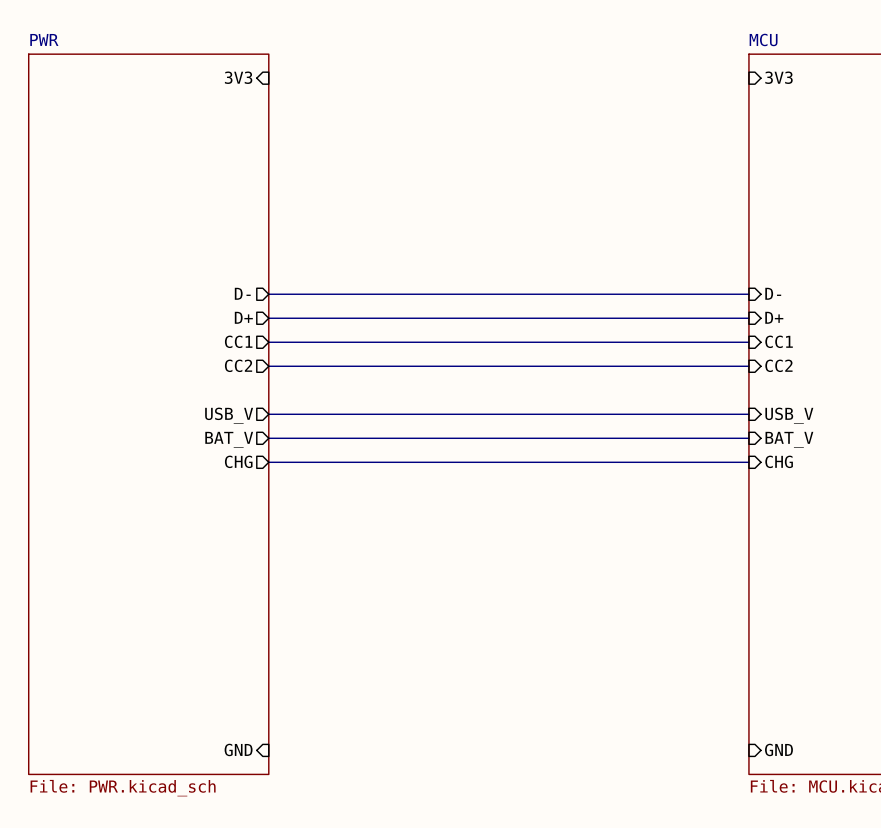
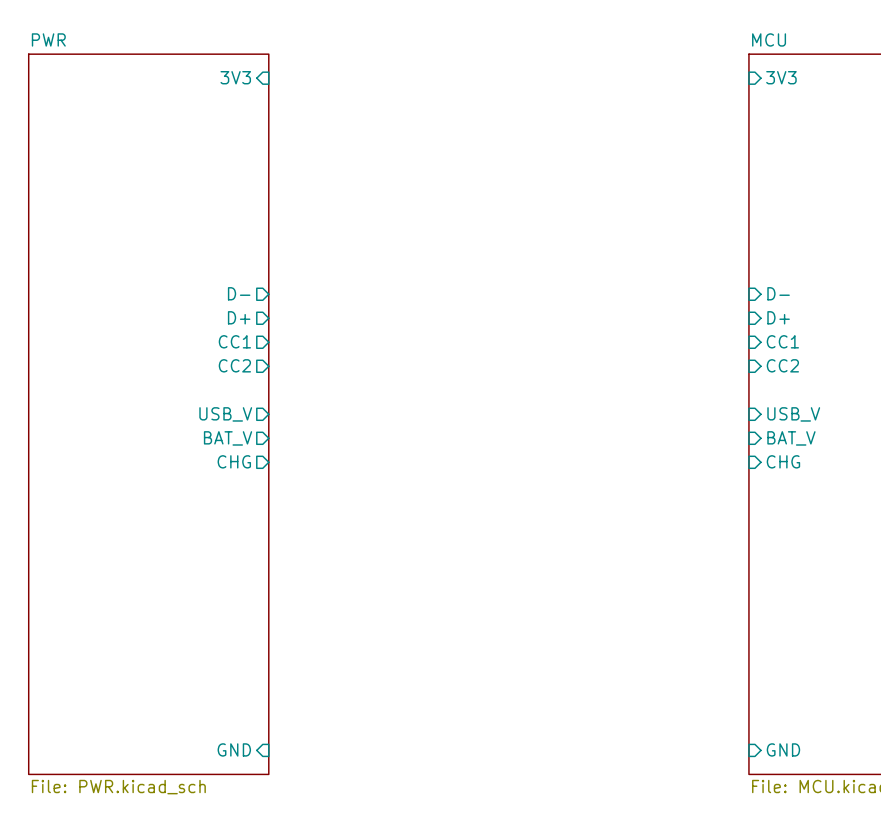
wire: (268, 294) (748, 294) -> none
wire: (268, 318) (748, 318) -> none
wire: (268, 342) (748, 342) -> none
wire: (268, 366) (748, 366) -> none
wire: (268, 414) (748, 414) -> none
wire: (268, 438) (748, 438) -> none
wire: (268, 462) (748, 462) -> none

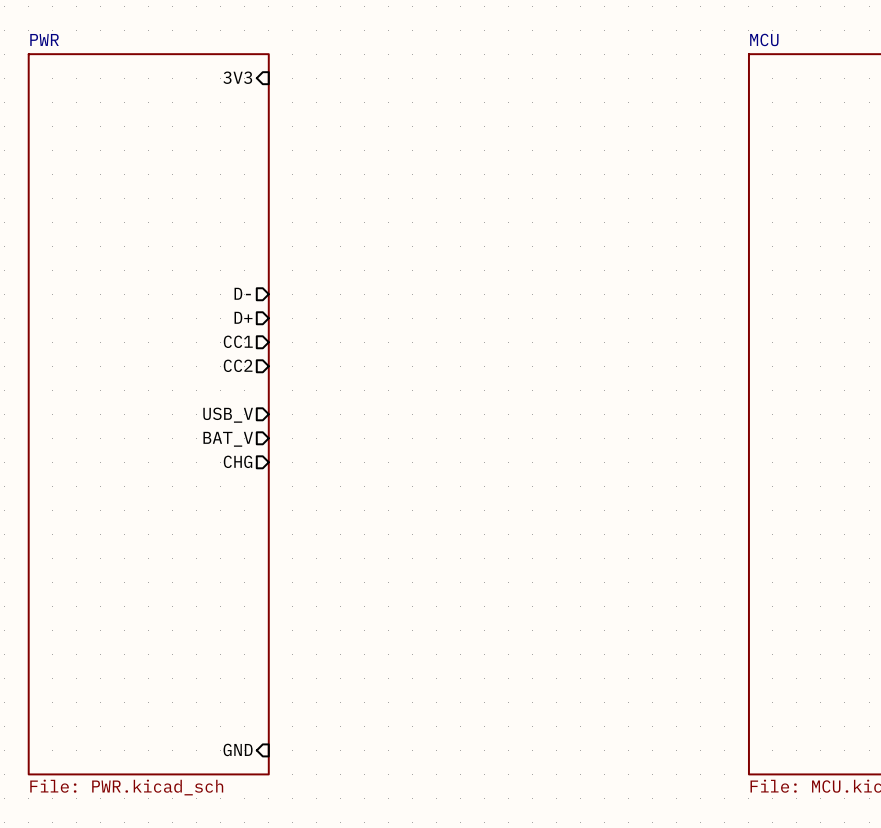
sheet pin: 3V3 (781, 77) -> none
sheet pin: D- (778, 293) -> none
sheet pin: D+ (778, 317) -> none
sheet pin: CC1 (782, 341) -> none
sheet pin: CC2 (782, 365) -> none
sheet pin: USB_V (793, 414) -> none
sheet pin: BAT_V (791, 438) -> none
sheet pin: CHG (783, 461) -> none
sheet pin: GND (783, 749) -> none

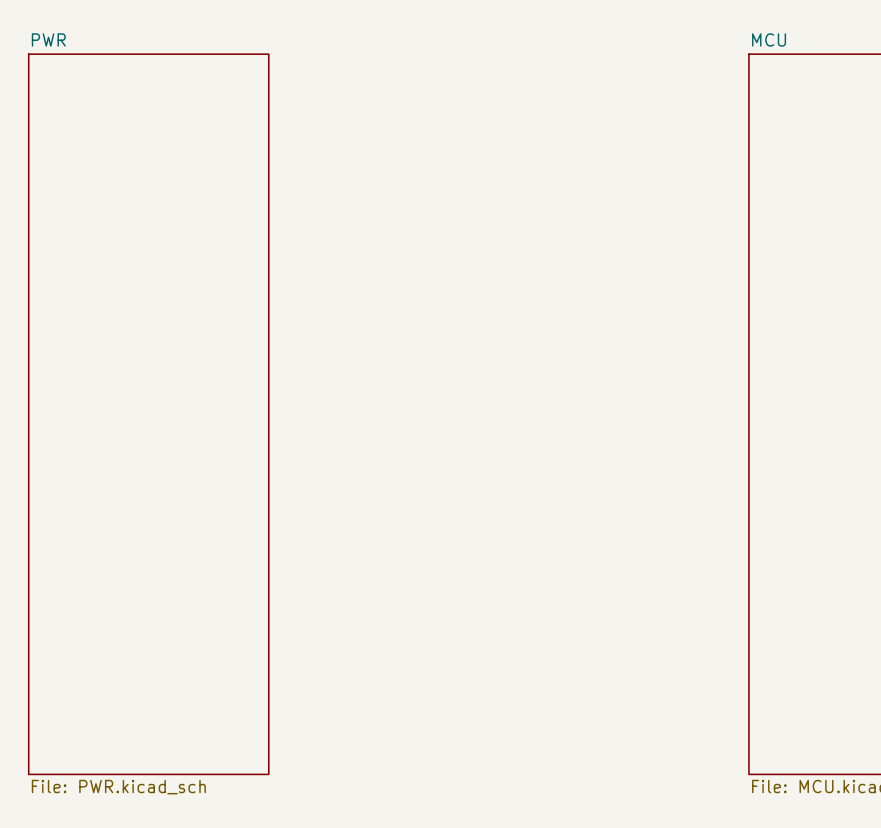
sheet pin: 3V3 (237, 77) -> none
sheet pin: D- (242, 293) -> none
sheet pin: D+ (243, 317) -> none
sheet pin: CC1 (238, 341) -> none
sheet pin: CC2 (238, 365) -> none
sheet pin: USB_V (228, 415) -> none
sheet pin: BAT_V (228, 439) -> none
sheet pin: CHG (238, 461) -> none
sheet pin: GND (238, 749) -> none

